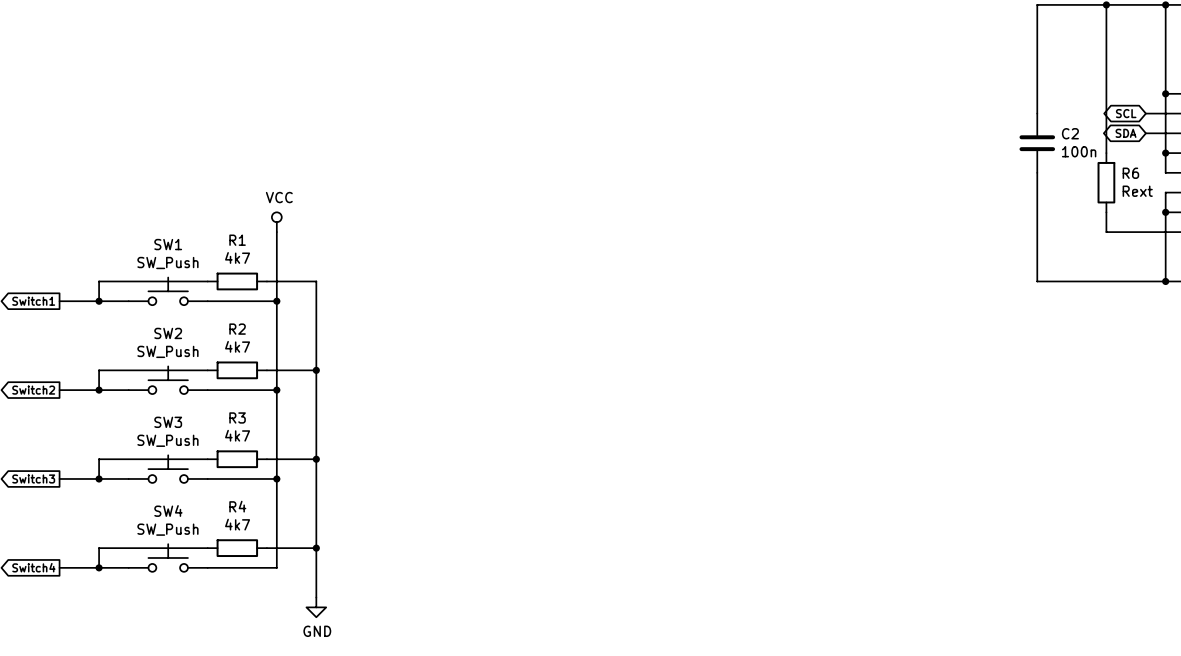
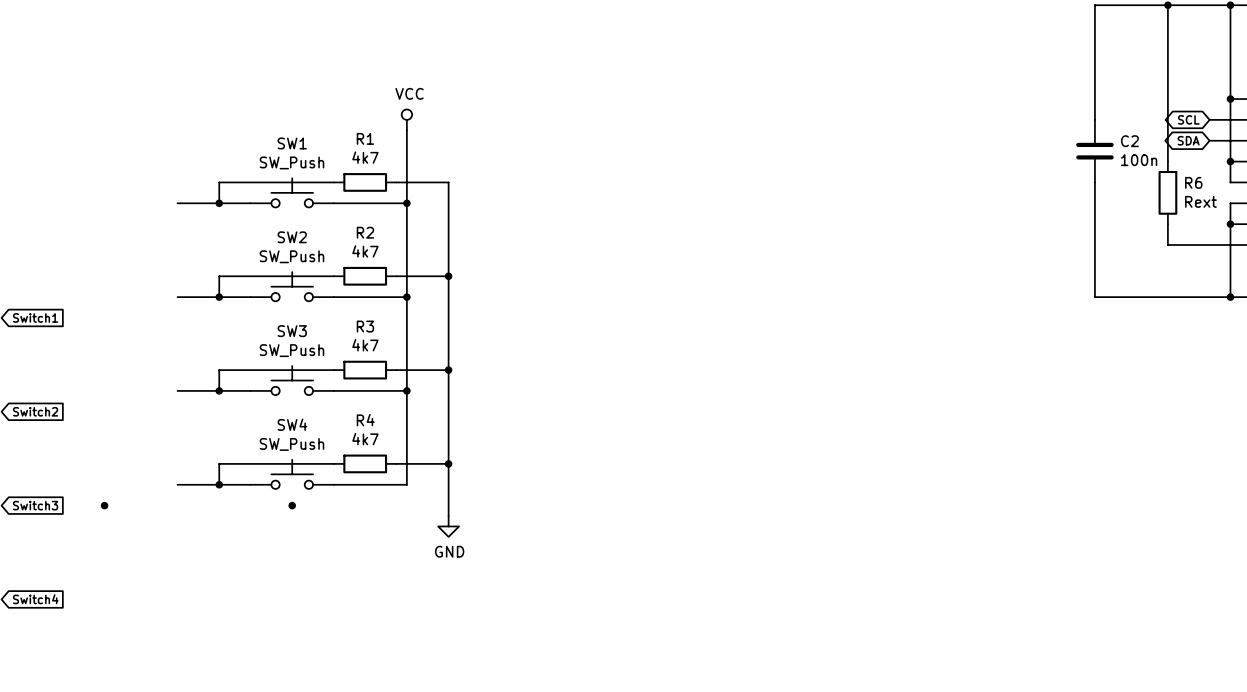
wire: none -> (333, 182) (219, 182) (219, 203)
junction: none -> (219, 203)
junction: none -> (406, 203)
power symbol position: VCC (276, 222) -> VCC (406, 119)
wire: (276, 232) (276, 567) (207, 567) -> none
wire: none -> (333, 276) (219, 276) (219, 297) (250, 297)
wire: none -> (396, 276) (448, 276)
junction: none -> (448, 276)
wire: (168, 281) (99, 281) (99, 301) -> none
junction: none -> (219, 297)
R1 position: (237, 281) -> (365, 182)
wire: (266, 281) (316, 281) (316, 597) -> (396, 182) (448, 182) (448, 516)
junction: none -> (406, 297)
SW1 position: (168, 291) -> (292, 192)
wire: (59, 301) (128, 301) -> (177, 203) (250, 203)
junction: (99, 301) -> none
wire: (207, 301) (276, 301) -> (333, 203) (406, 203)
junction: (276, 301) -> none
wire: none -> (333, 370) (219, 370) (219, 390) (250, 390)
wire: none -> (396, 370) (448, 370)
junction: none -> (448, 370)
wire: (168, 370) (99, 370) (99, 390) -> none
junction: none -> (219, 390)
R2 position: (237, 370) -> (365, 276)
wire: (266, 370) (316, 370) -> (406, 390) (333, 390)
junction: (316, 370) -> none
junction: none -> (406, 390)
SW2 position: (168, 380) -> (292, 286)
wire: (59, 390) (128, 390) -> none
junction: (99, 390) -> none
wire: (207, 390) (276, 390) -> (333, 297) (406, 297)
junction: (276, 390) -> none
wire: none -> (333, 463) (219, 463) (219, 484) (250, 484)
junction: none -> (448, 463)
wire: (168, 459) (99, 459) (99, 478) -> none
junction: none -> (219, 484)
R3 position: (237, 459) -> (365, 370)
wire: (266, 459) (316, 459) -> (406, 130) (406, 484) (333, 484)
junction: (316, 459) -> none
SW3 position: (168, 469) -> (292, 380)
wire: (59, 478) (128, 478) -> none
wire: (207, 478) (276, 478) -> none
wire: (207, 548) (99, 548) (99, 567) -> none
R4 position: (237, 548) -> (365, 463)
wire: (266, 548) (316, 548) -> (396, 463) (448, 463)
junction: (316, 548) -> none
SW4 position: (168, 558) -> (292, 474)
wire: (59, 567) (128, 567) -> none
junction: (99, 567) -> none
power symbol position: GND (316, 607) -> GND (448, 526)

